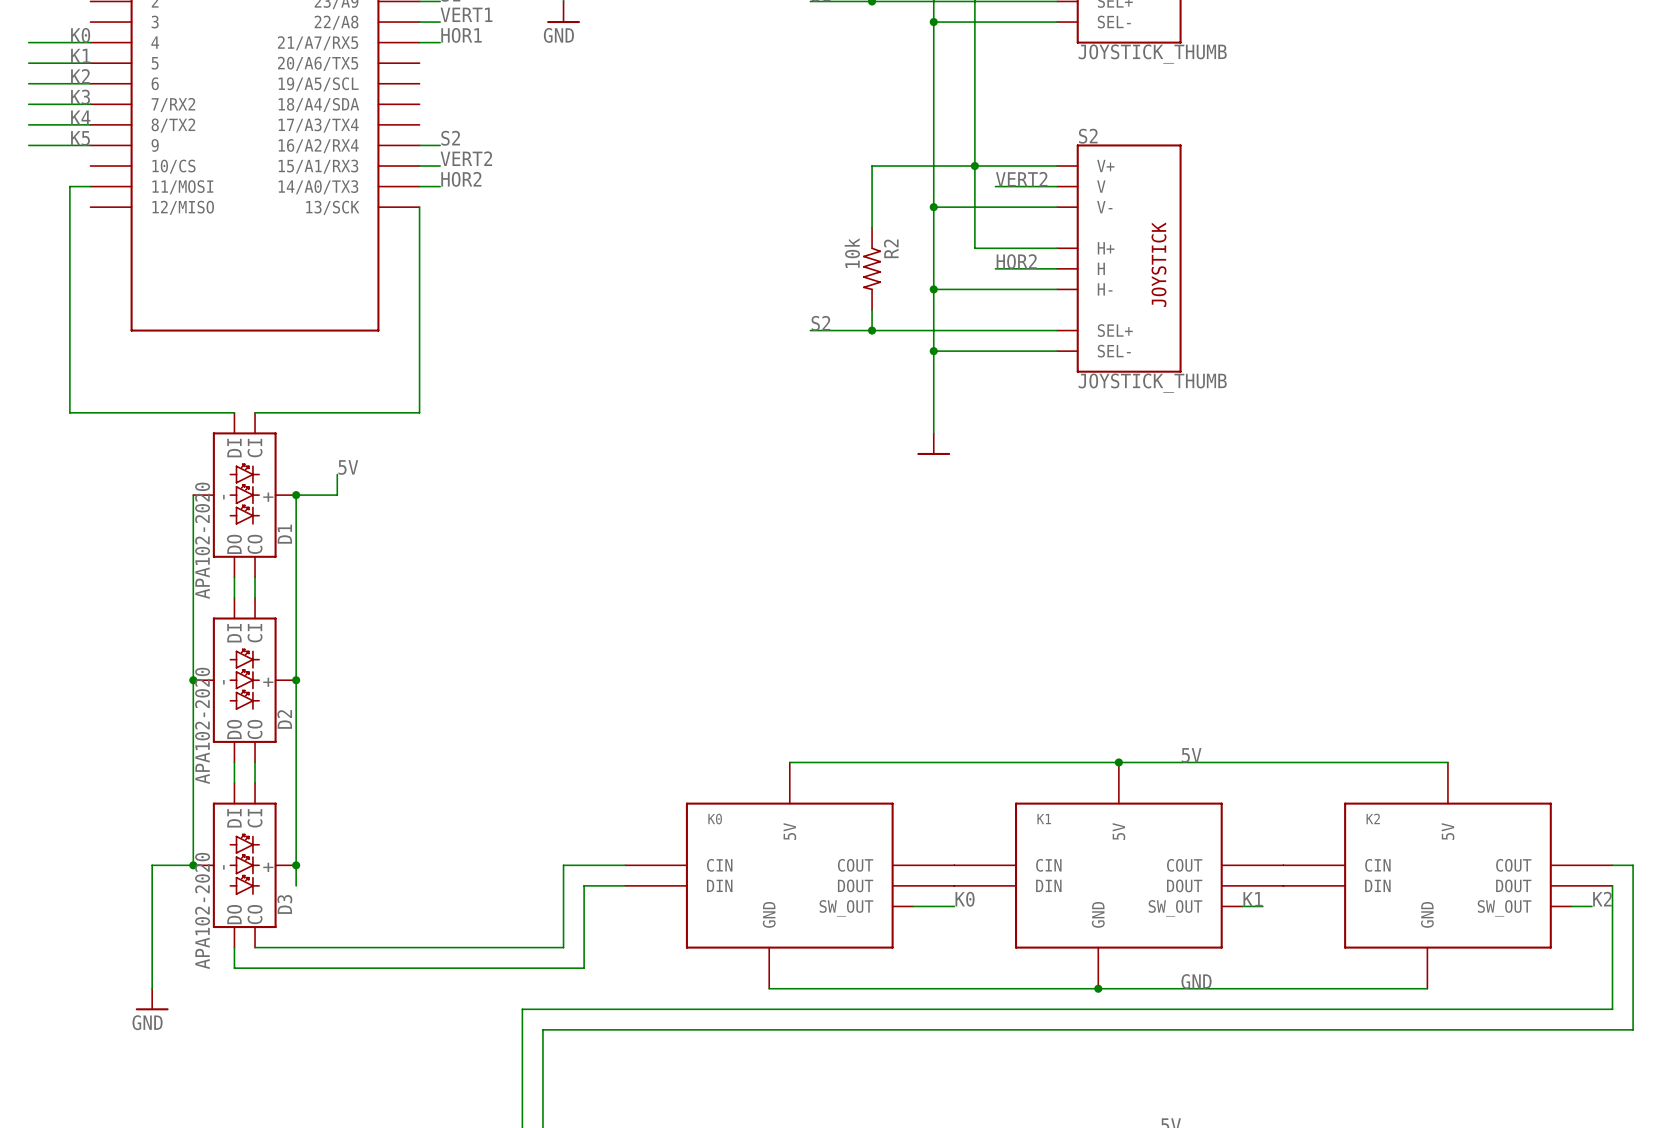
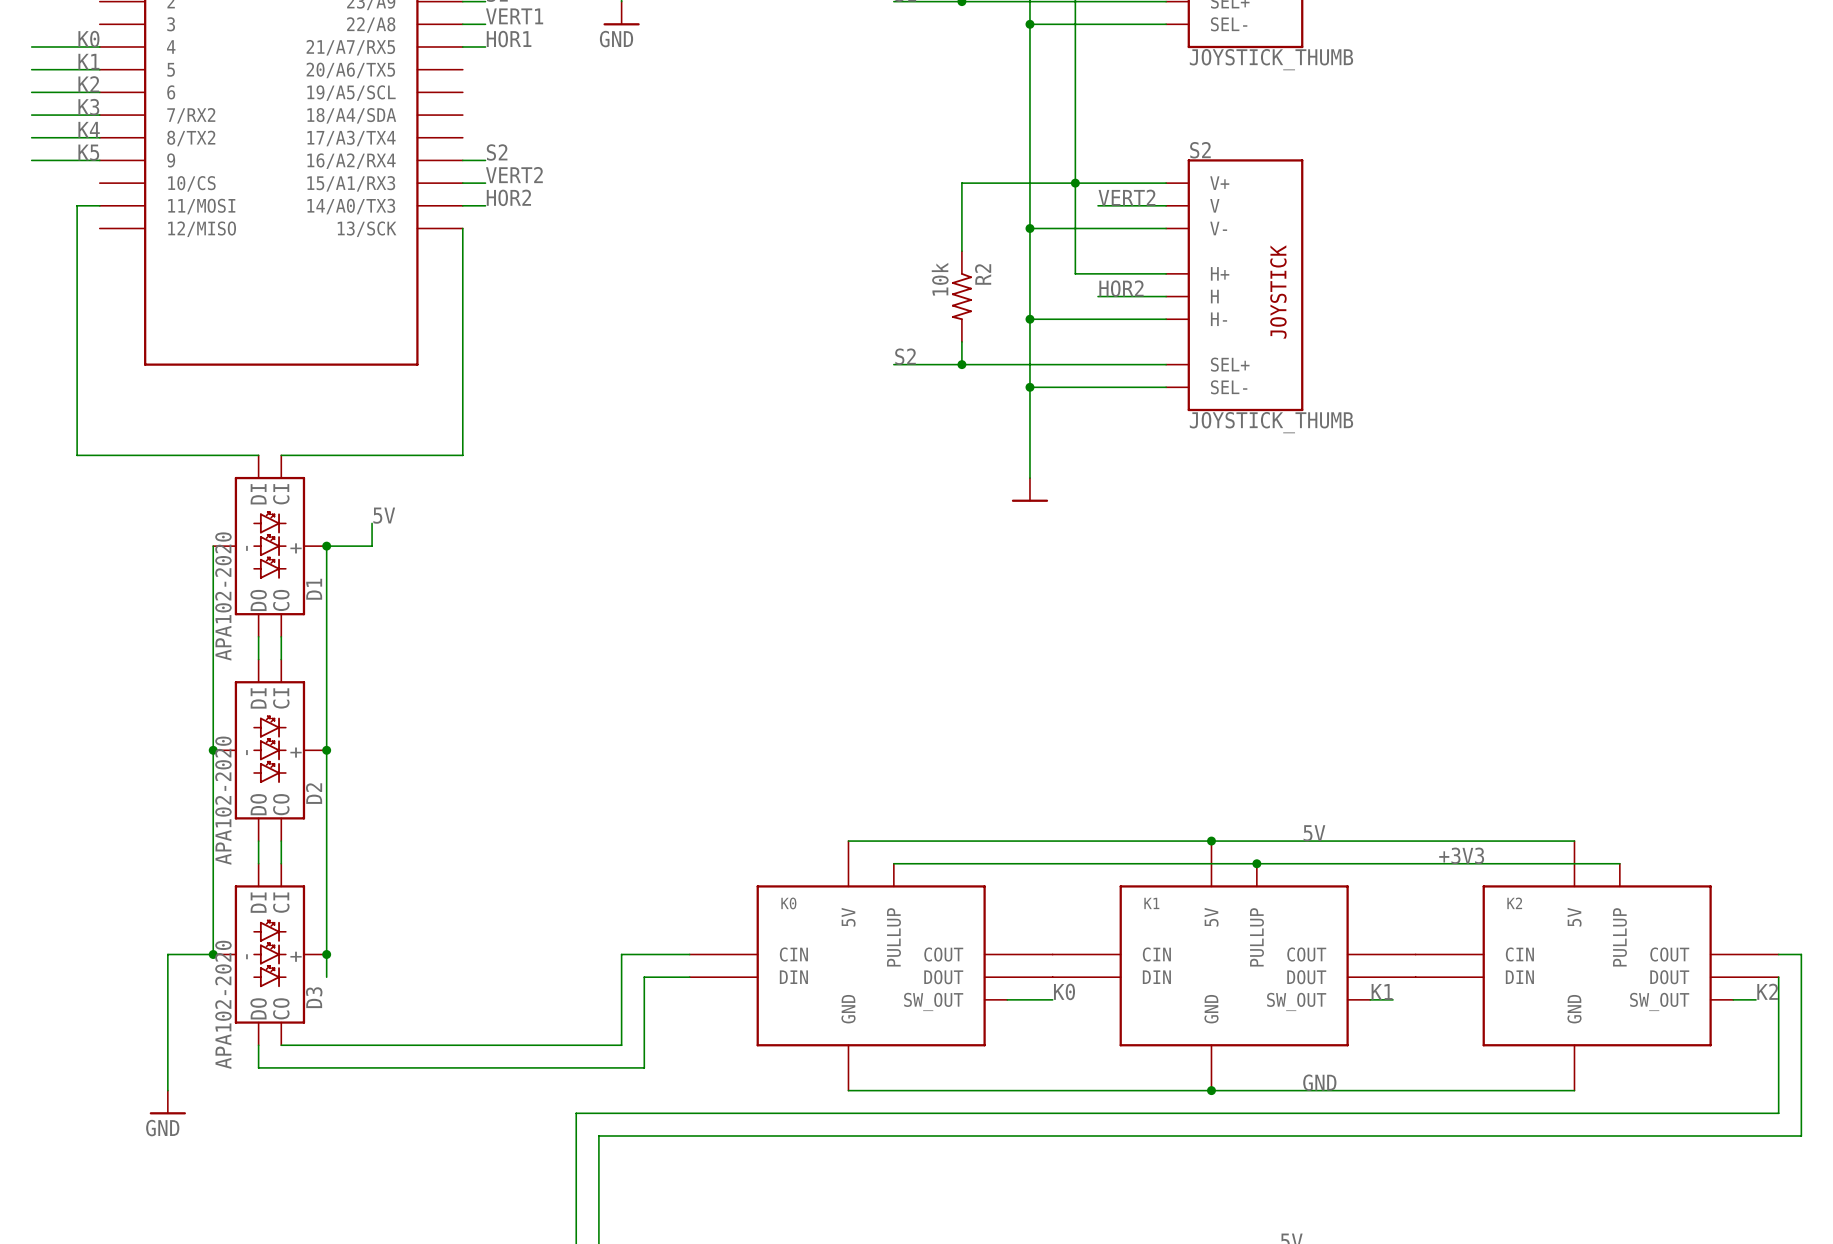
K0 symbol: [625, 762, 955, 989] -> [689, 841, 1053, 1091]
wire: none -> (848, 841) (871, 841)
K1 symbol: [954, 762, 1284, 989] -> [1052, 841, 1416, 1091]
junction: none -> (1211, 841)
junction: (1118, 762) -> none
K2 symbol: [1283, 762, 1613, 989] -> [1415, 841, 1779, 1091]
wire: (1427, 762) (1447, 762) -> none
label: none -> +3V3 (1461, 855)
wire: none -> (893, 863) (1619, 863)
junction: none -> (1256, 863)

